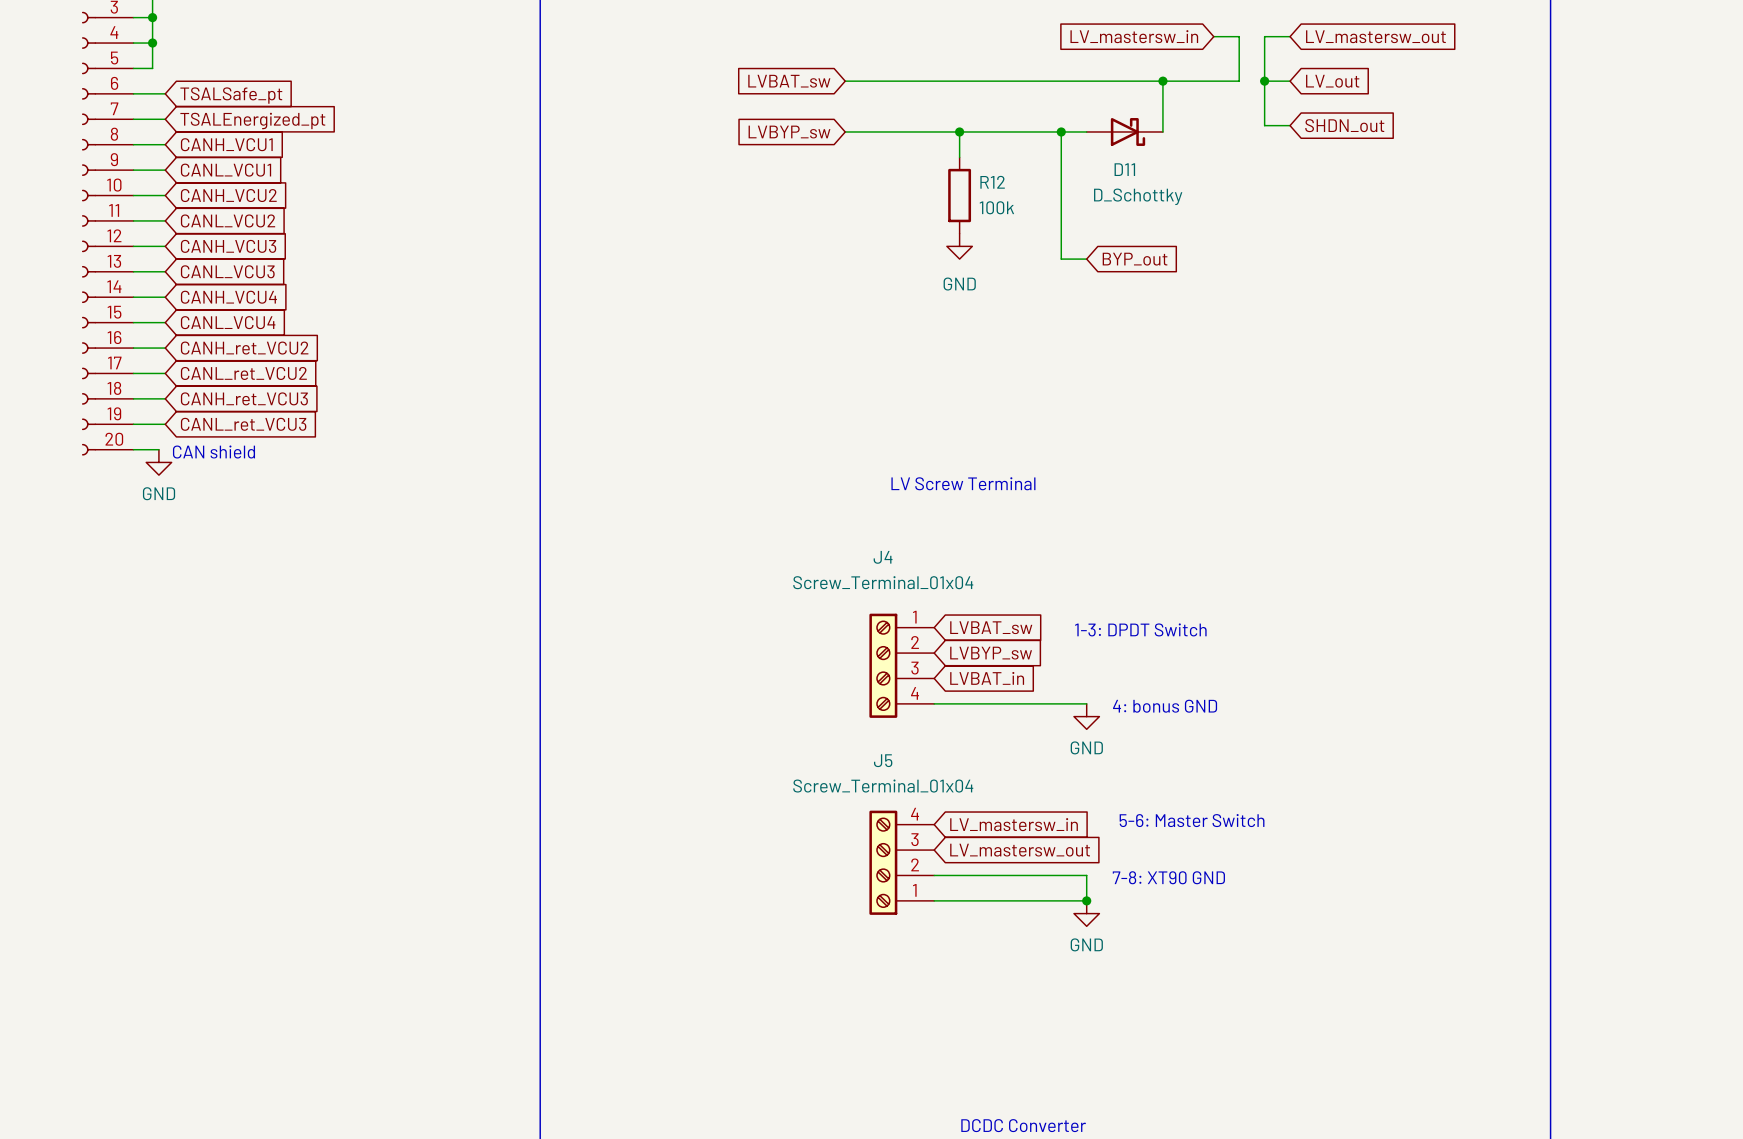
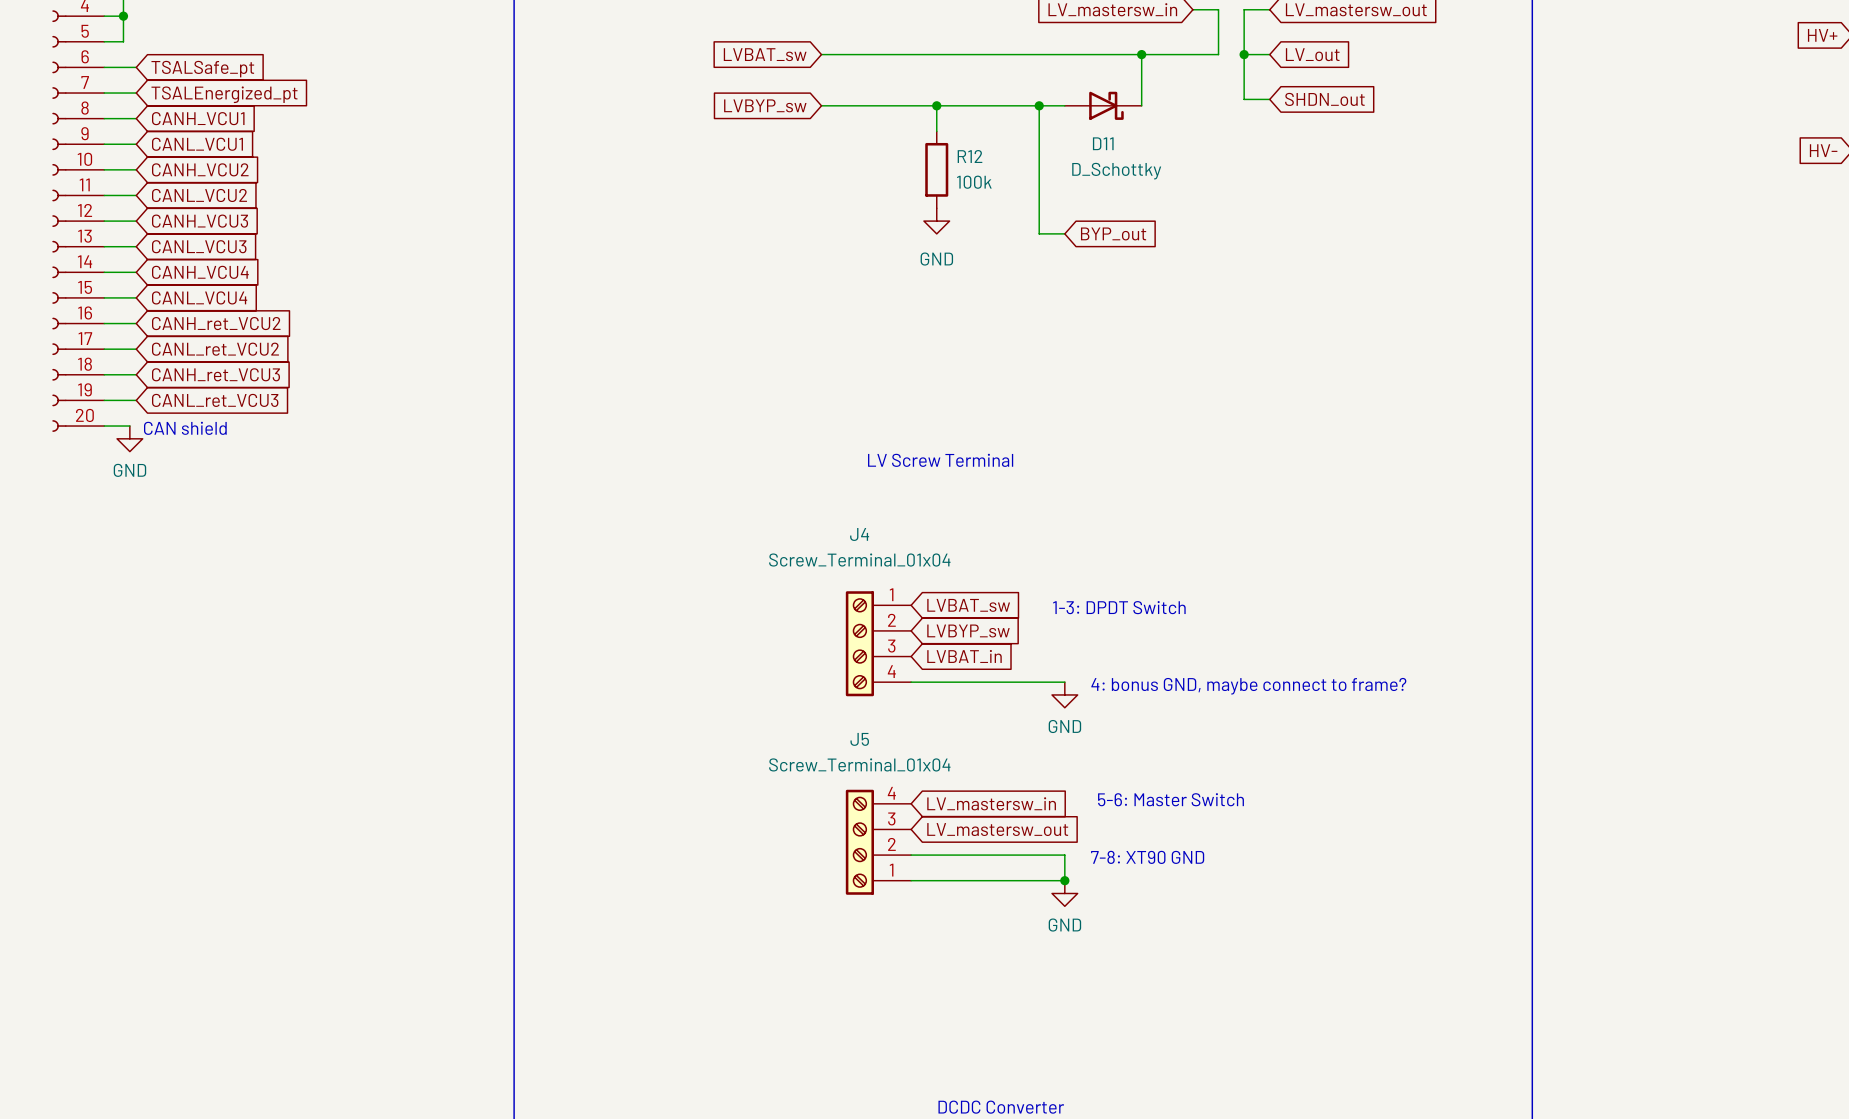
text: 4: bonus GND (1165, 706) -> 4: bonus GND, maybe connect to frame? (1248, 686)

